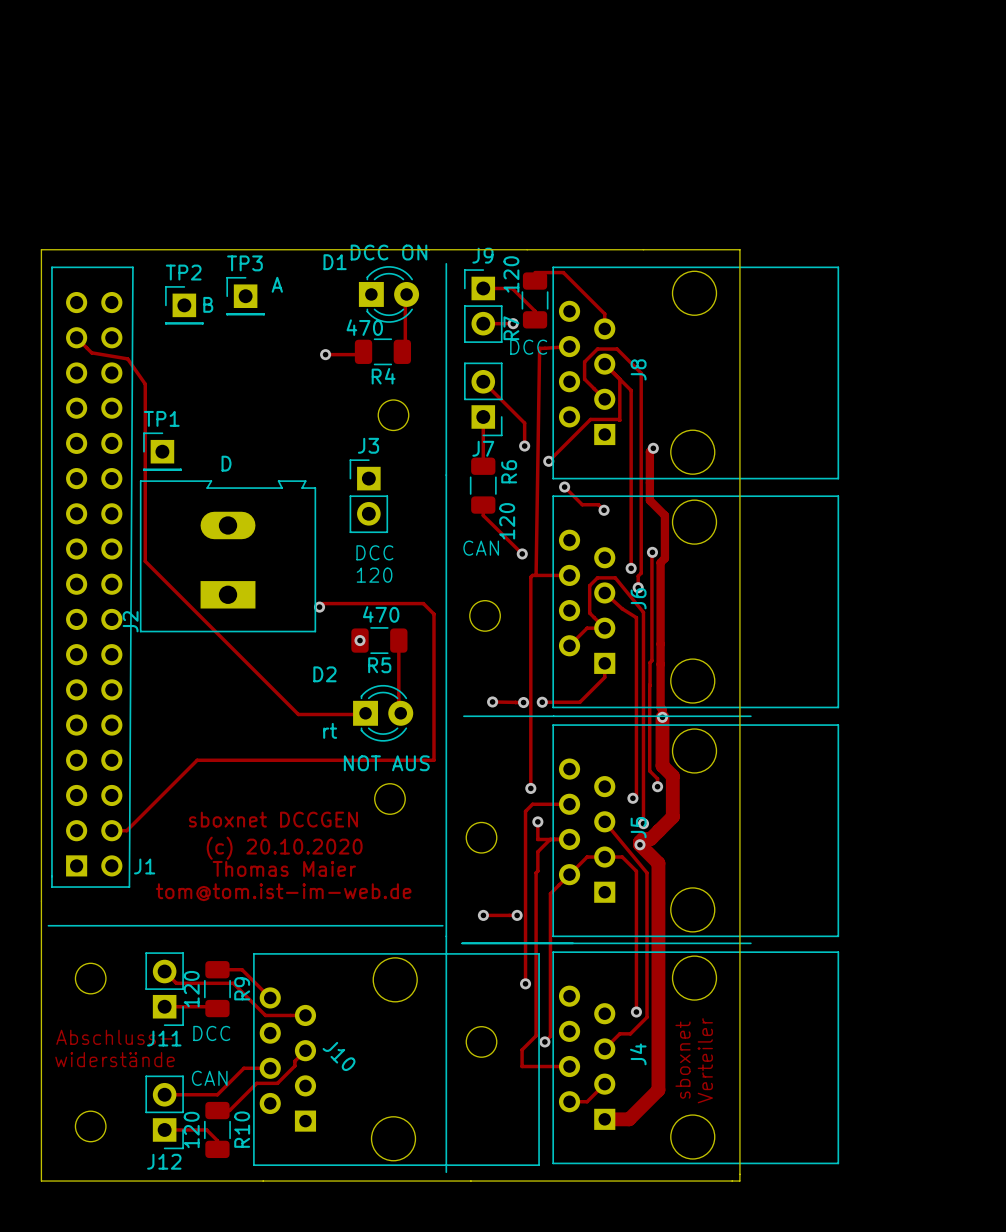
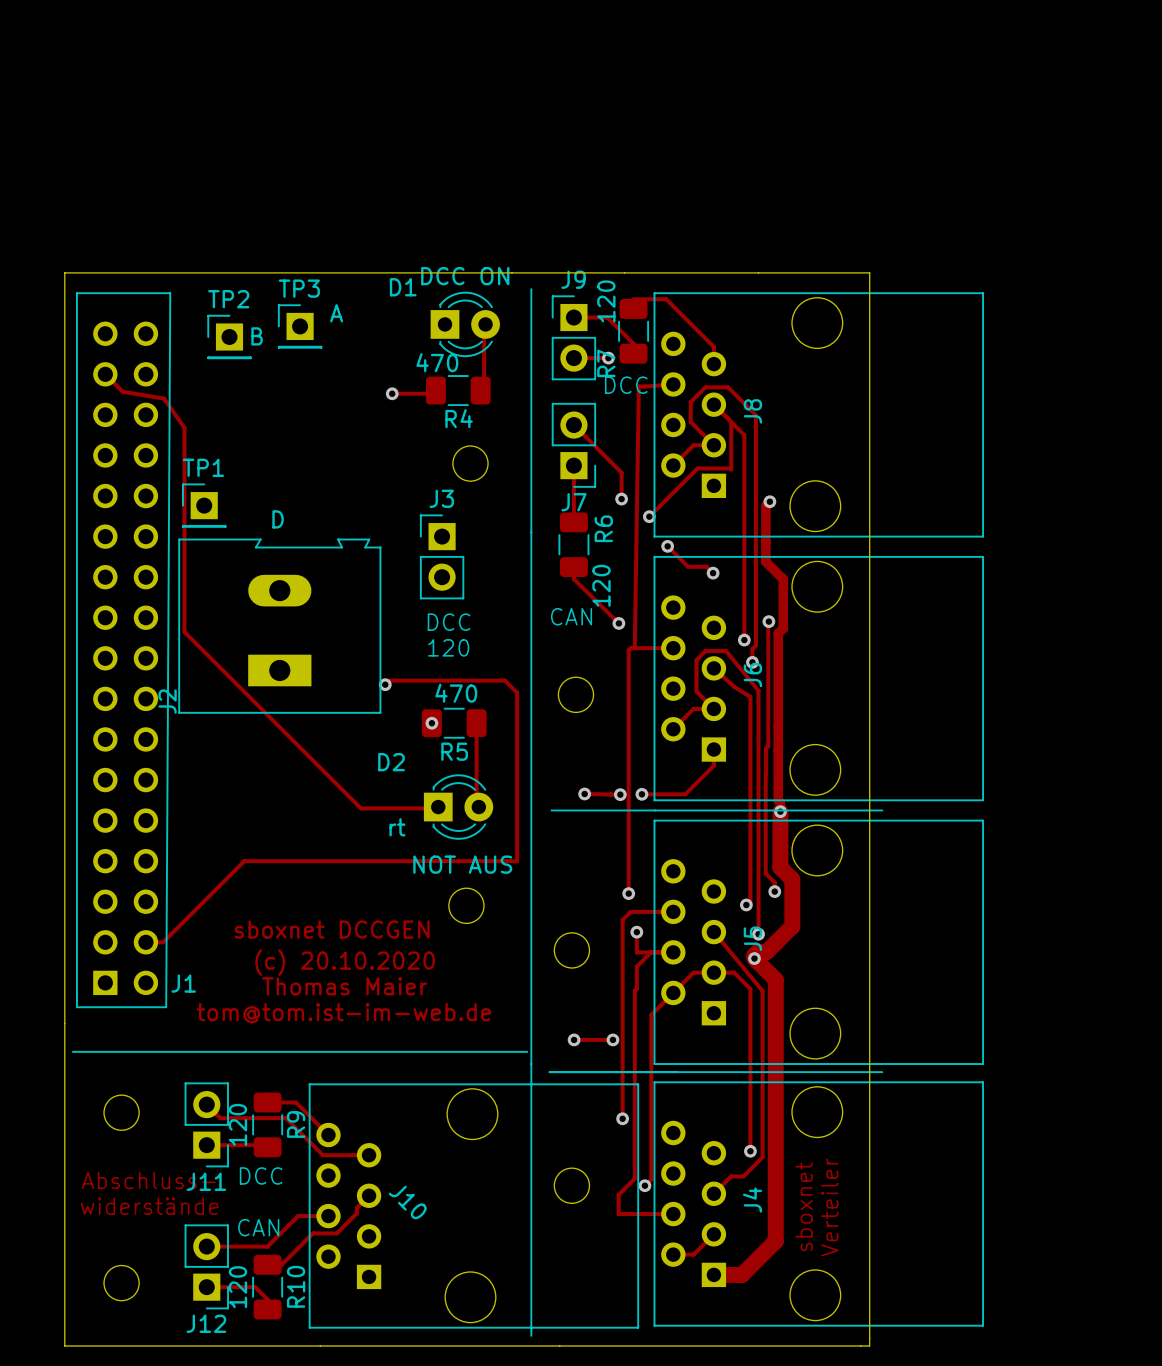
track: none -> (713, 445) (693, 445) (673, 465)

